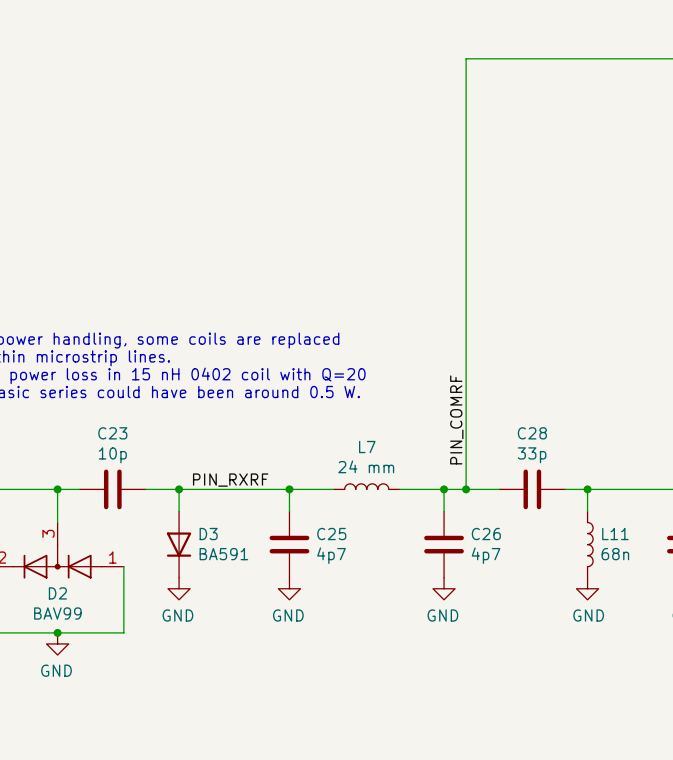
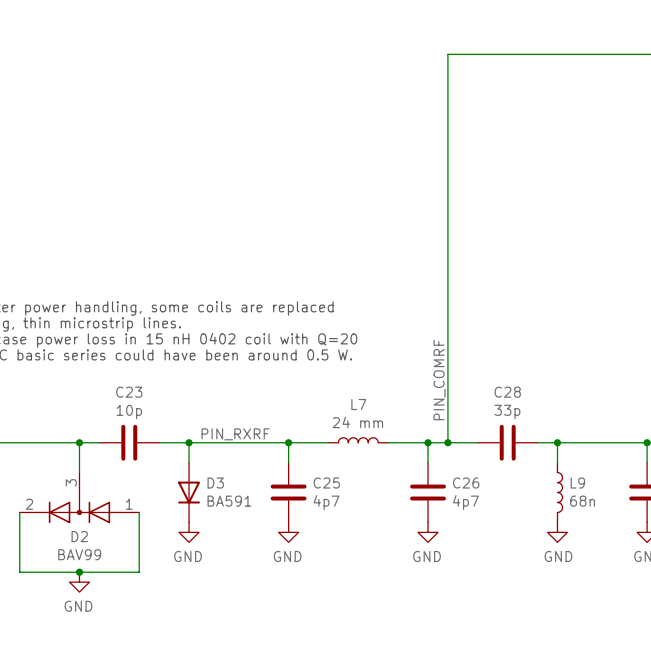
L11 name: L11 (615, 534) -> L9 (577, 483)

